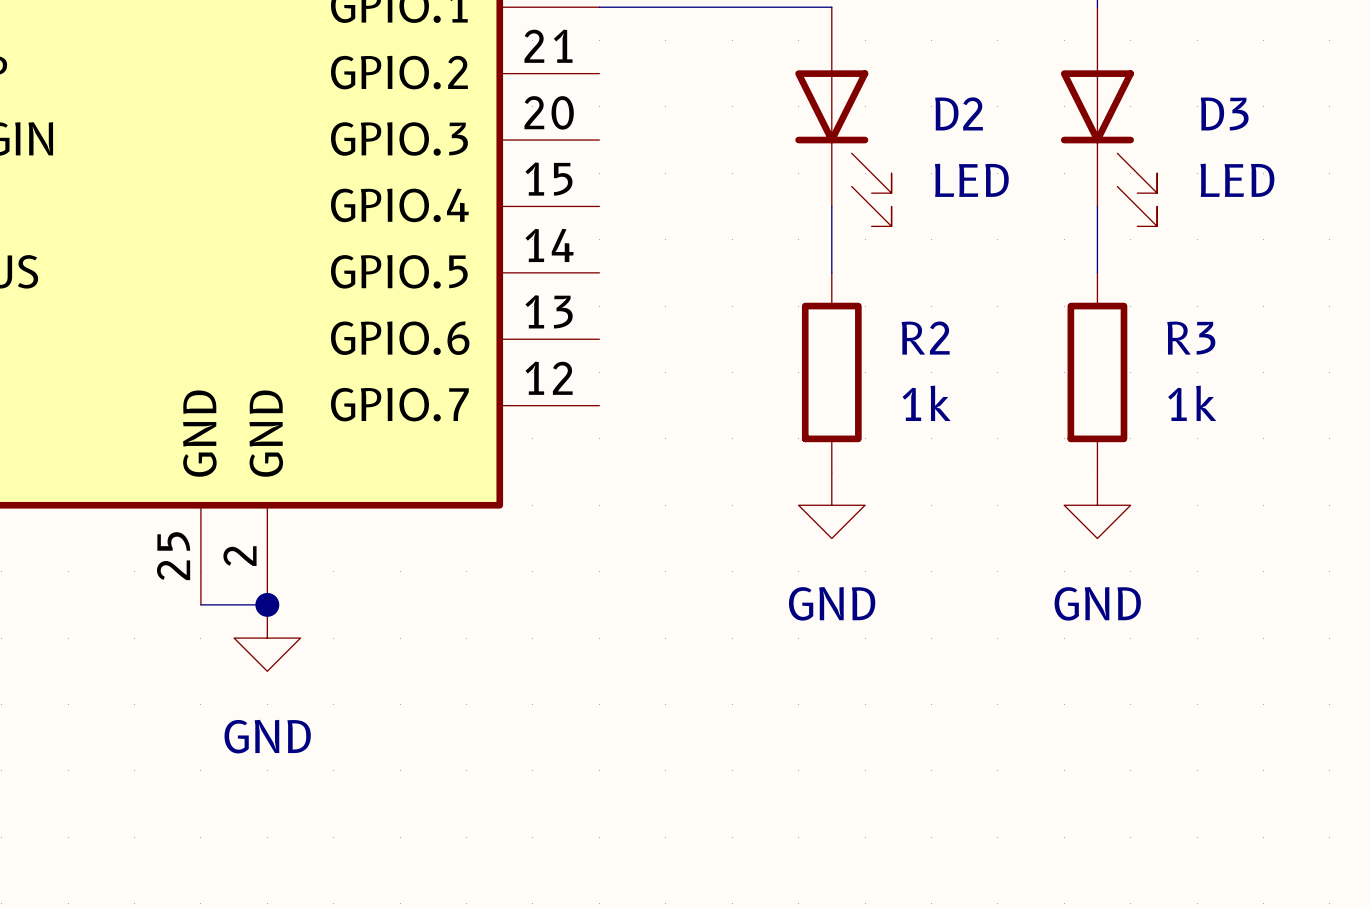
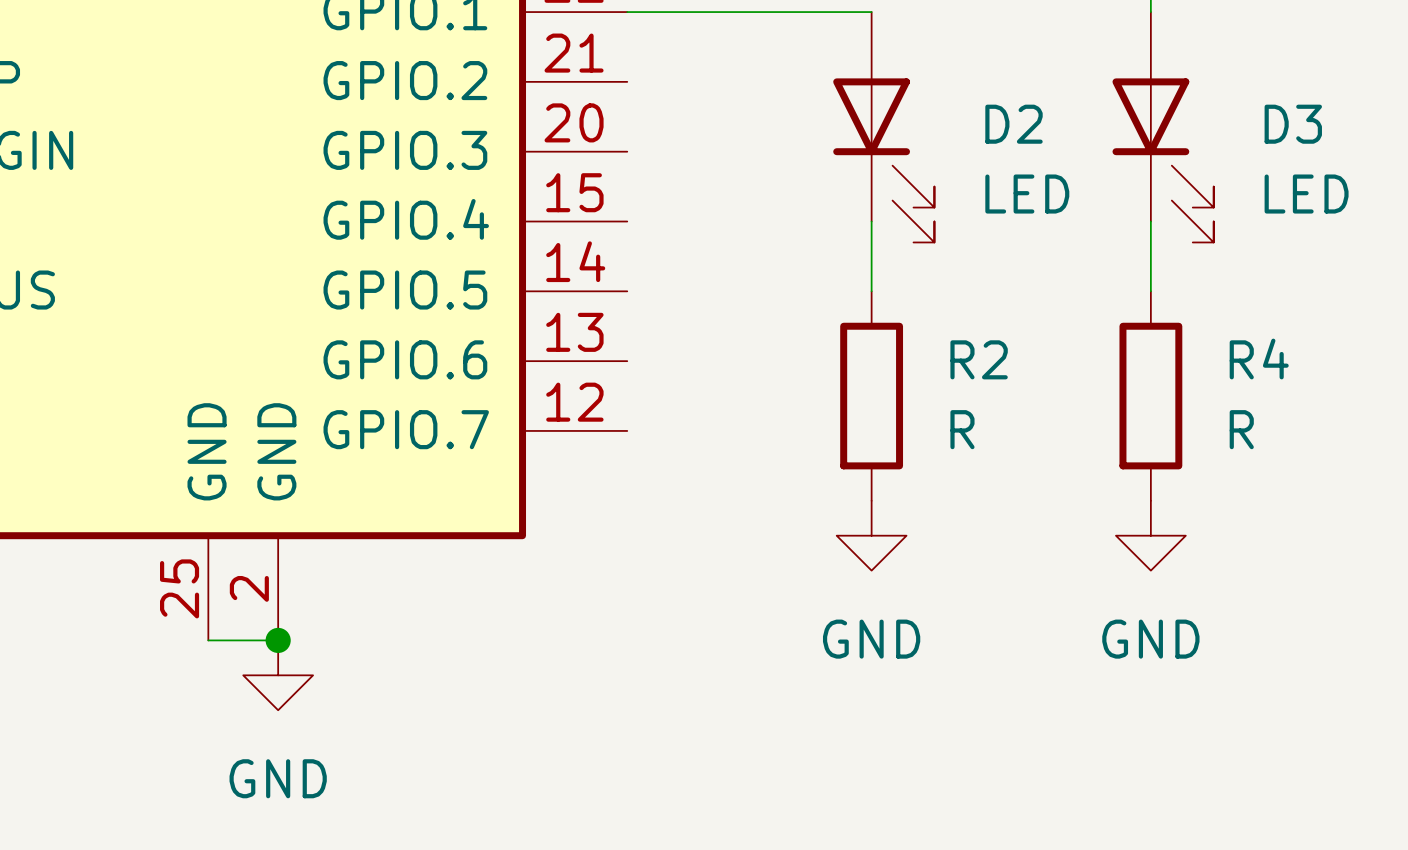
R3 name: R3 (1191, 338) -> R4 (1259, 359)
R2 value: 1k (926, 403) -> R (962, 429)
R3 value: 1k (1192, 403) -> R (1241, 429)

